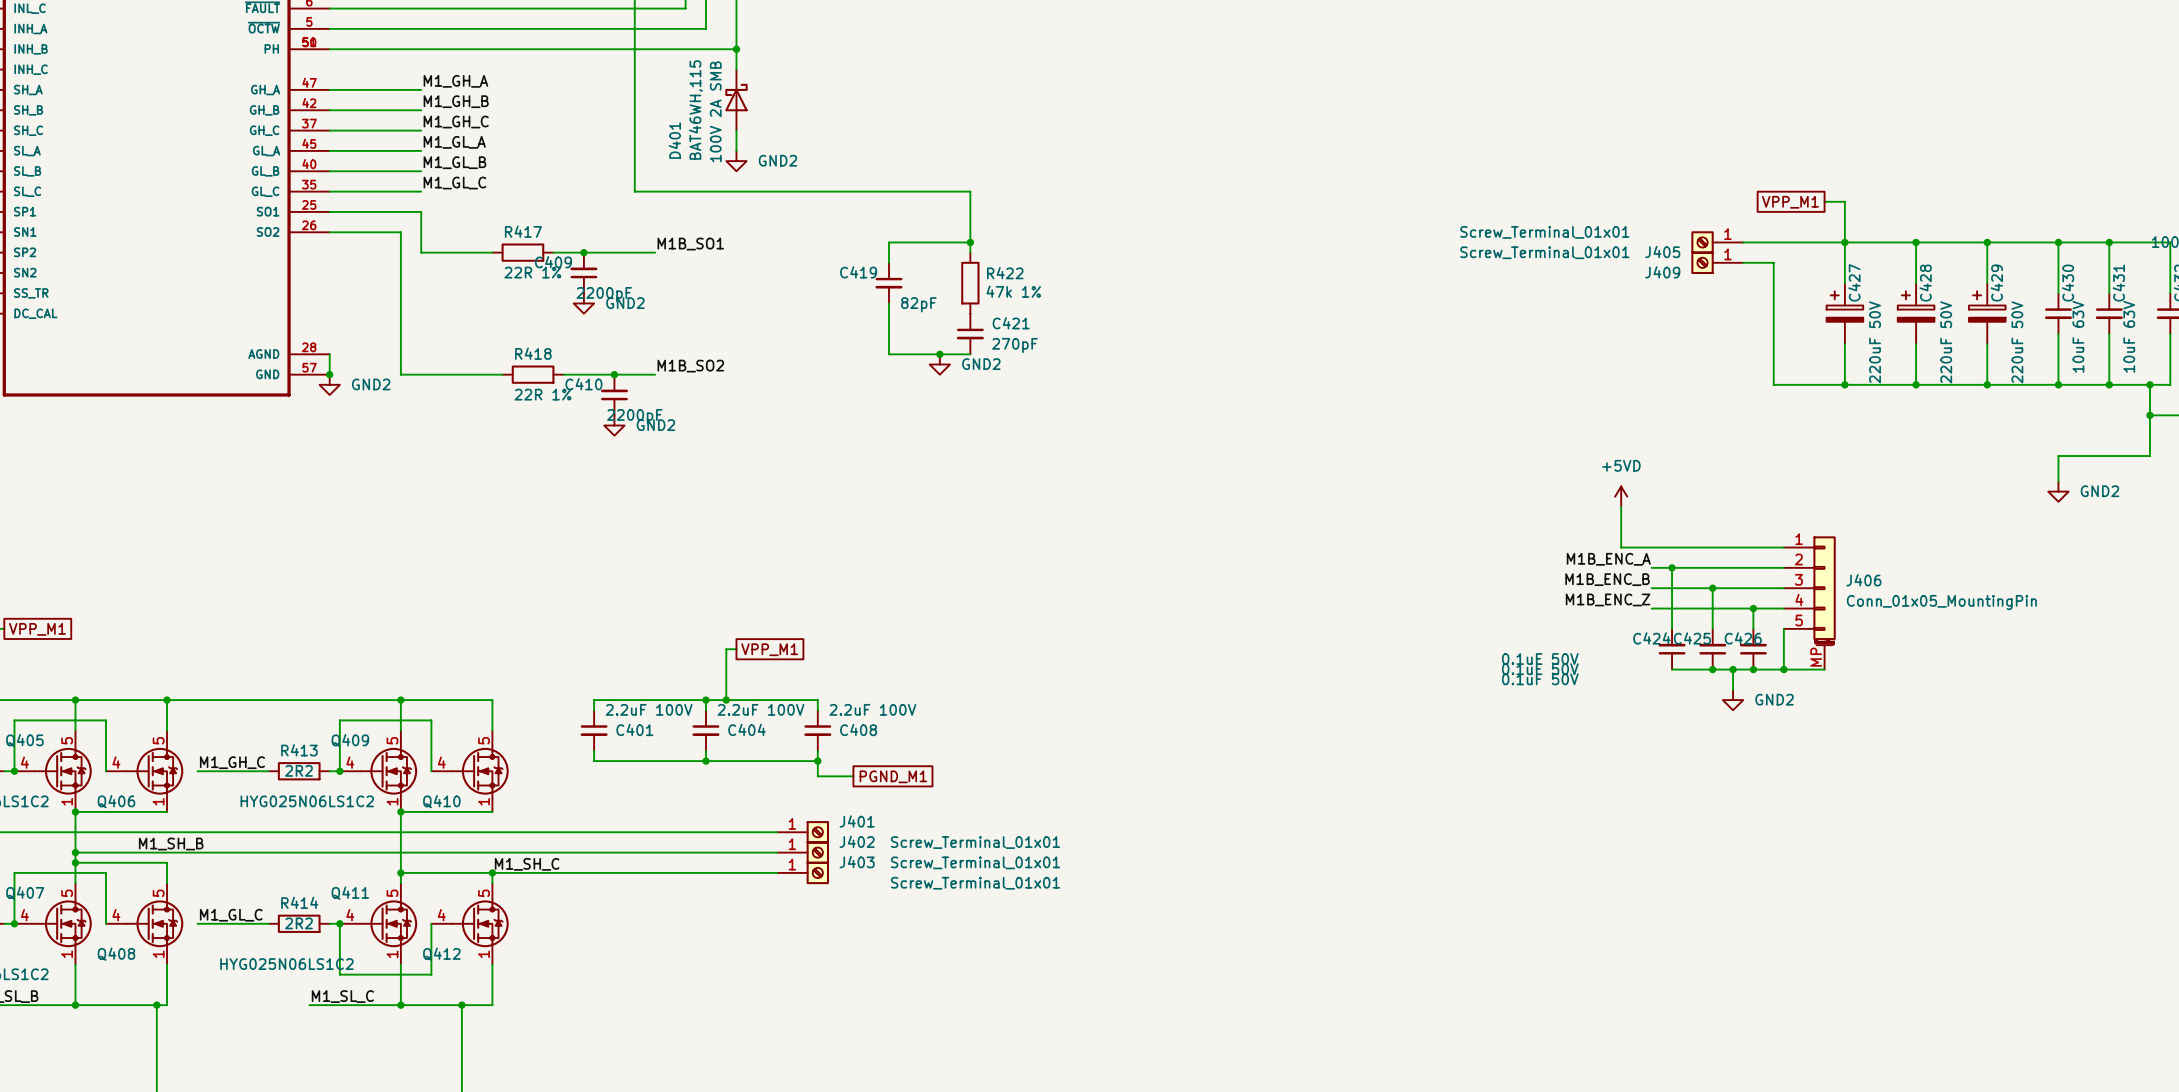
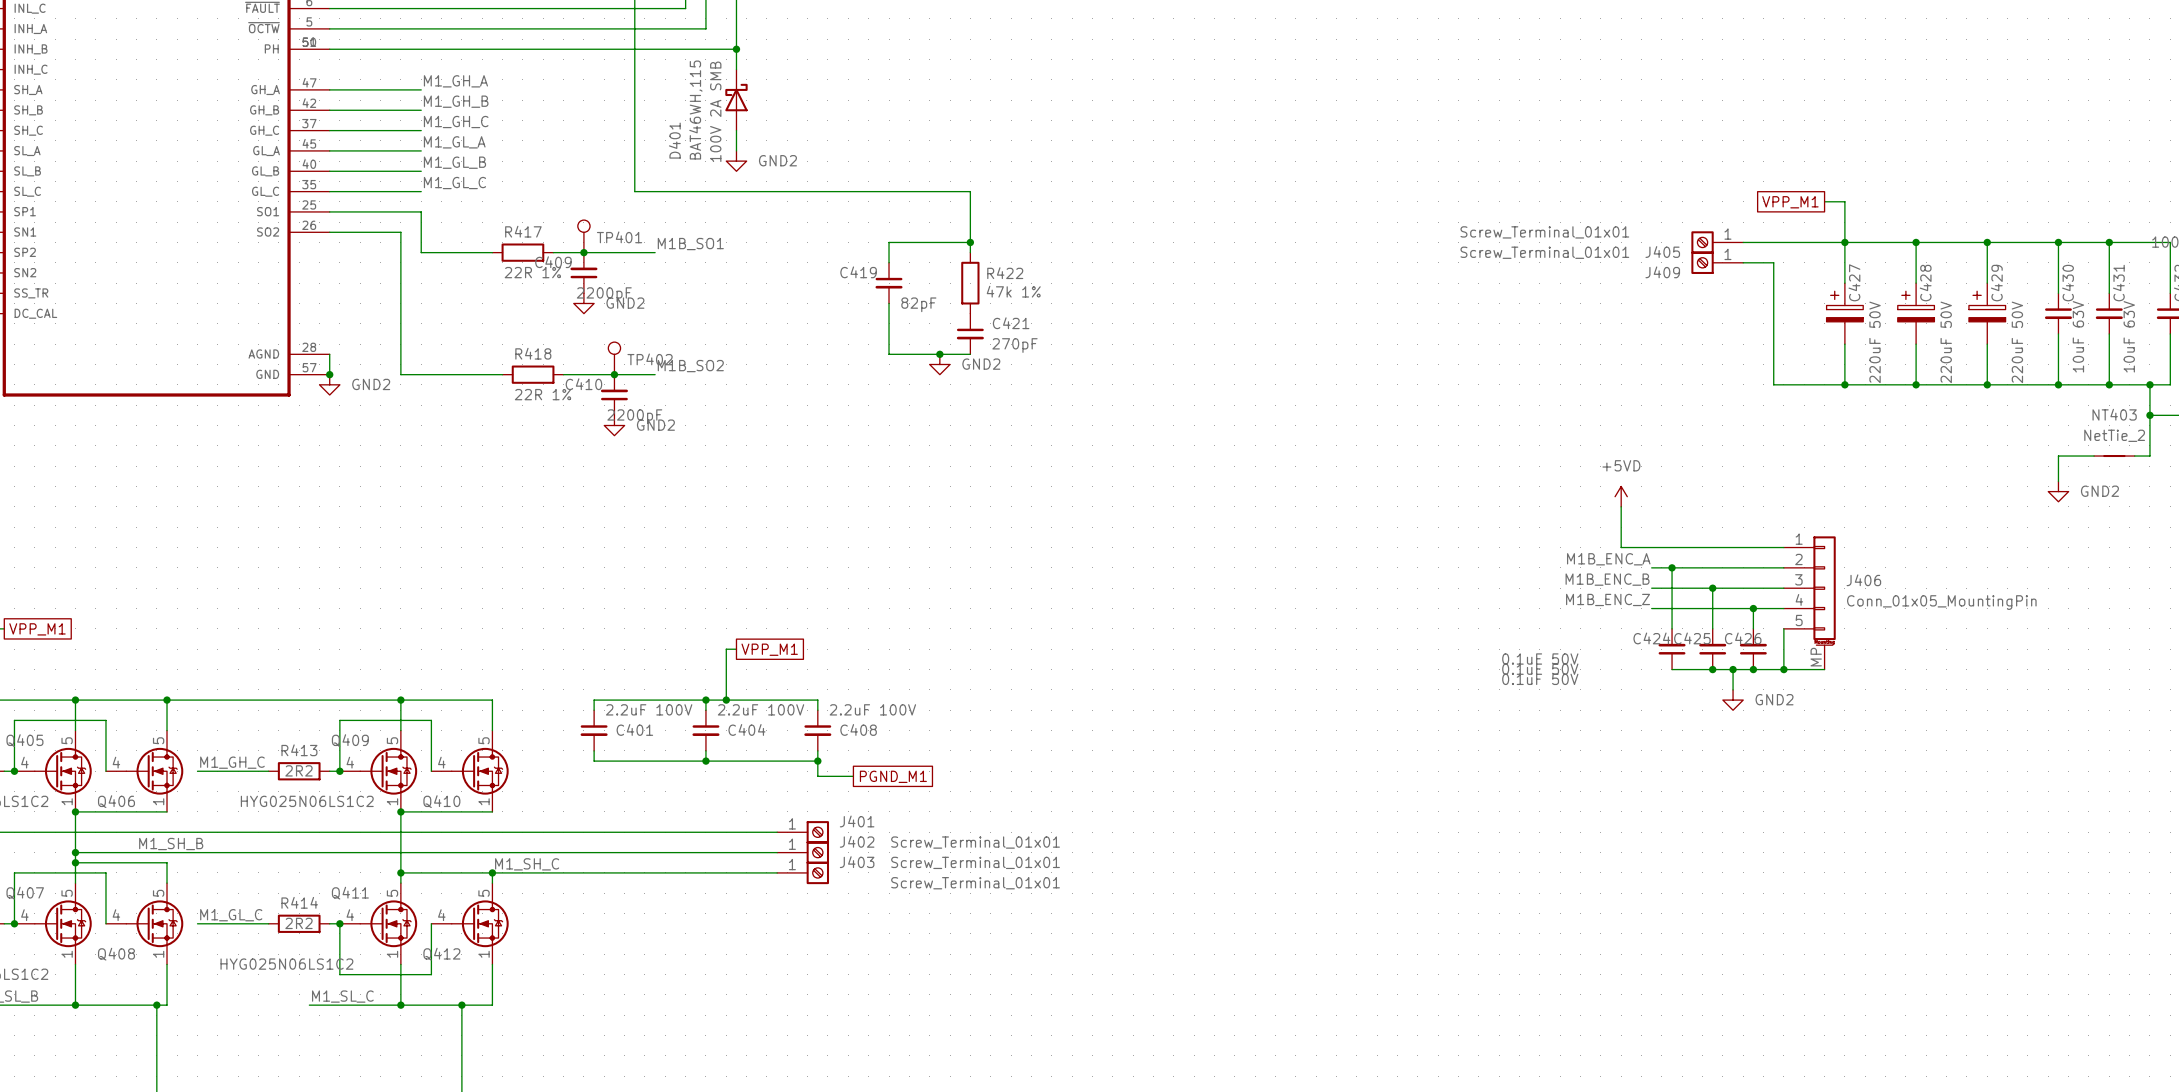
TP401: none -> (583, 236)
TP402: none -> (614, 358)
NT403: none -> NetTie_2 (2114, 456)

